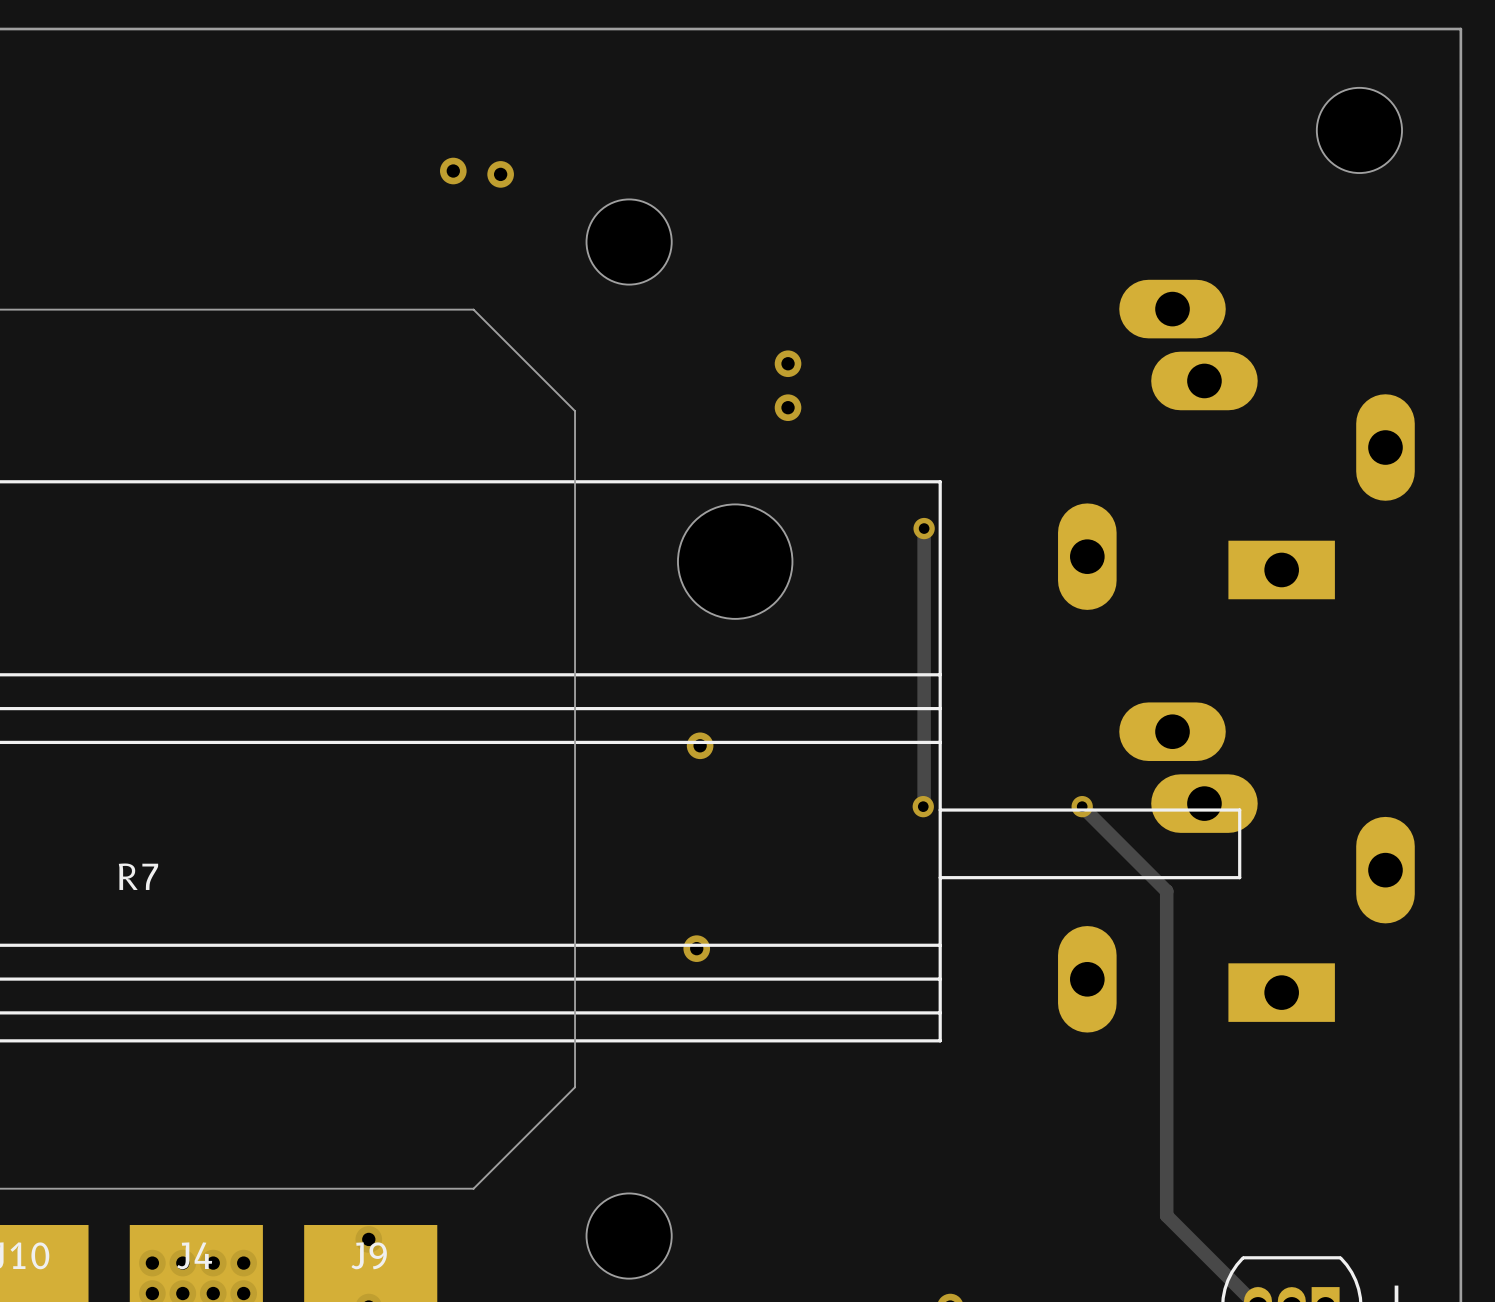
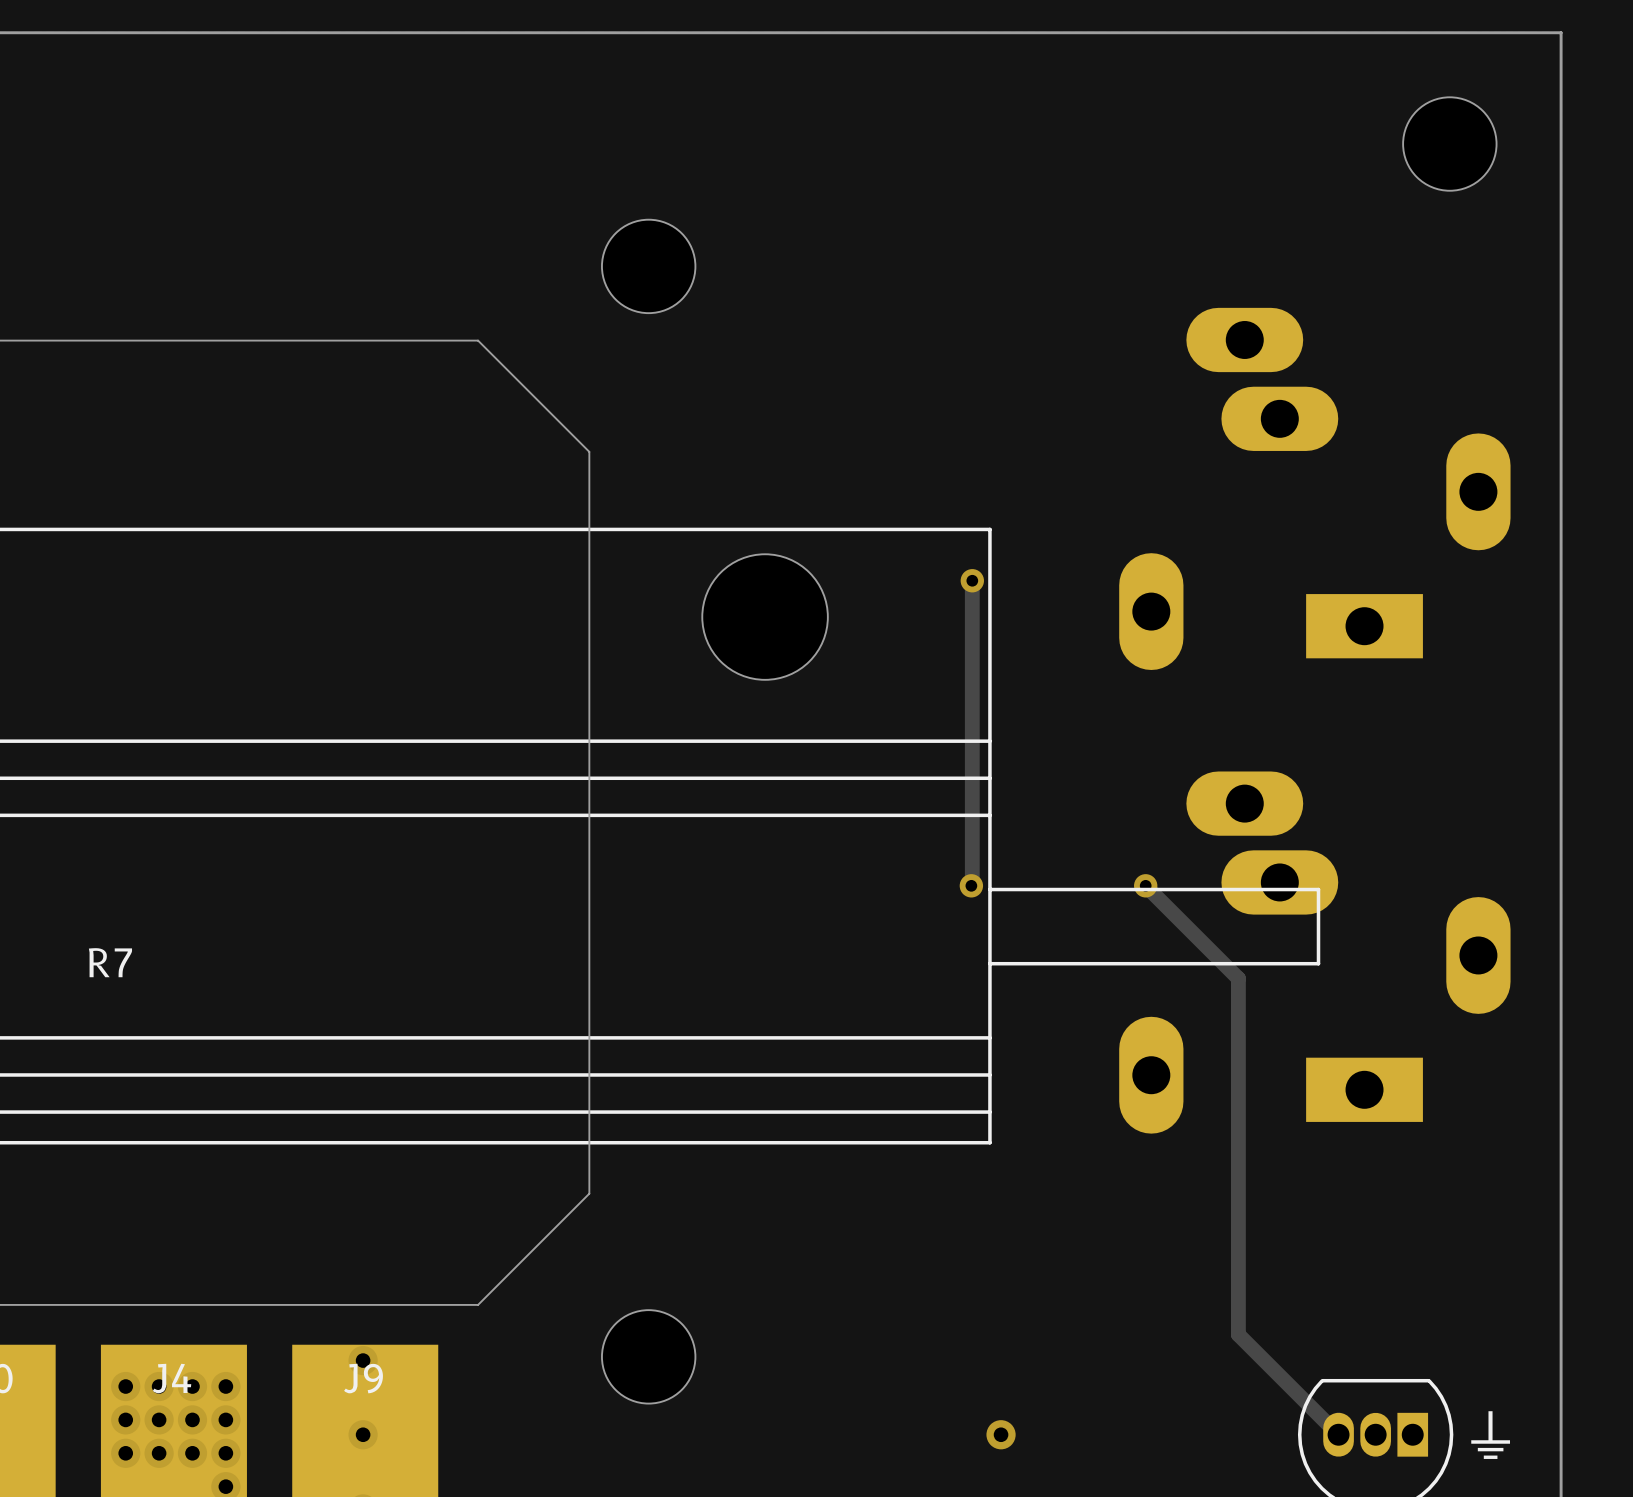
via: (453, 171) -> none
via: (500, 174) -> none
via: (788, 363) -> none
via: (788, 407) -> none
via: (700, 745) -> none
via: (696, 948) -> none

